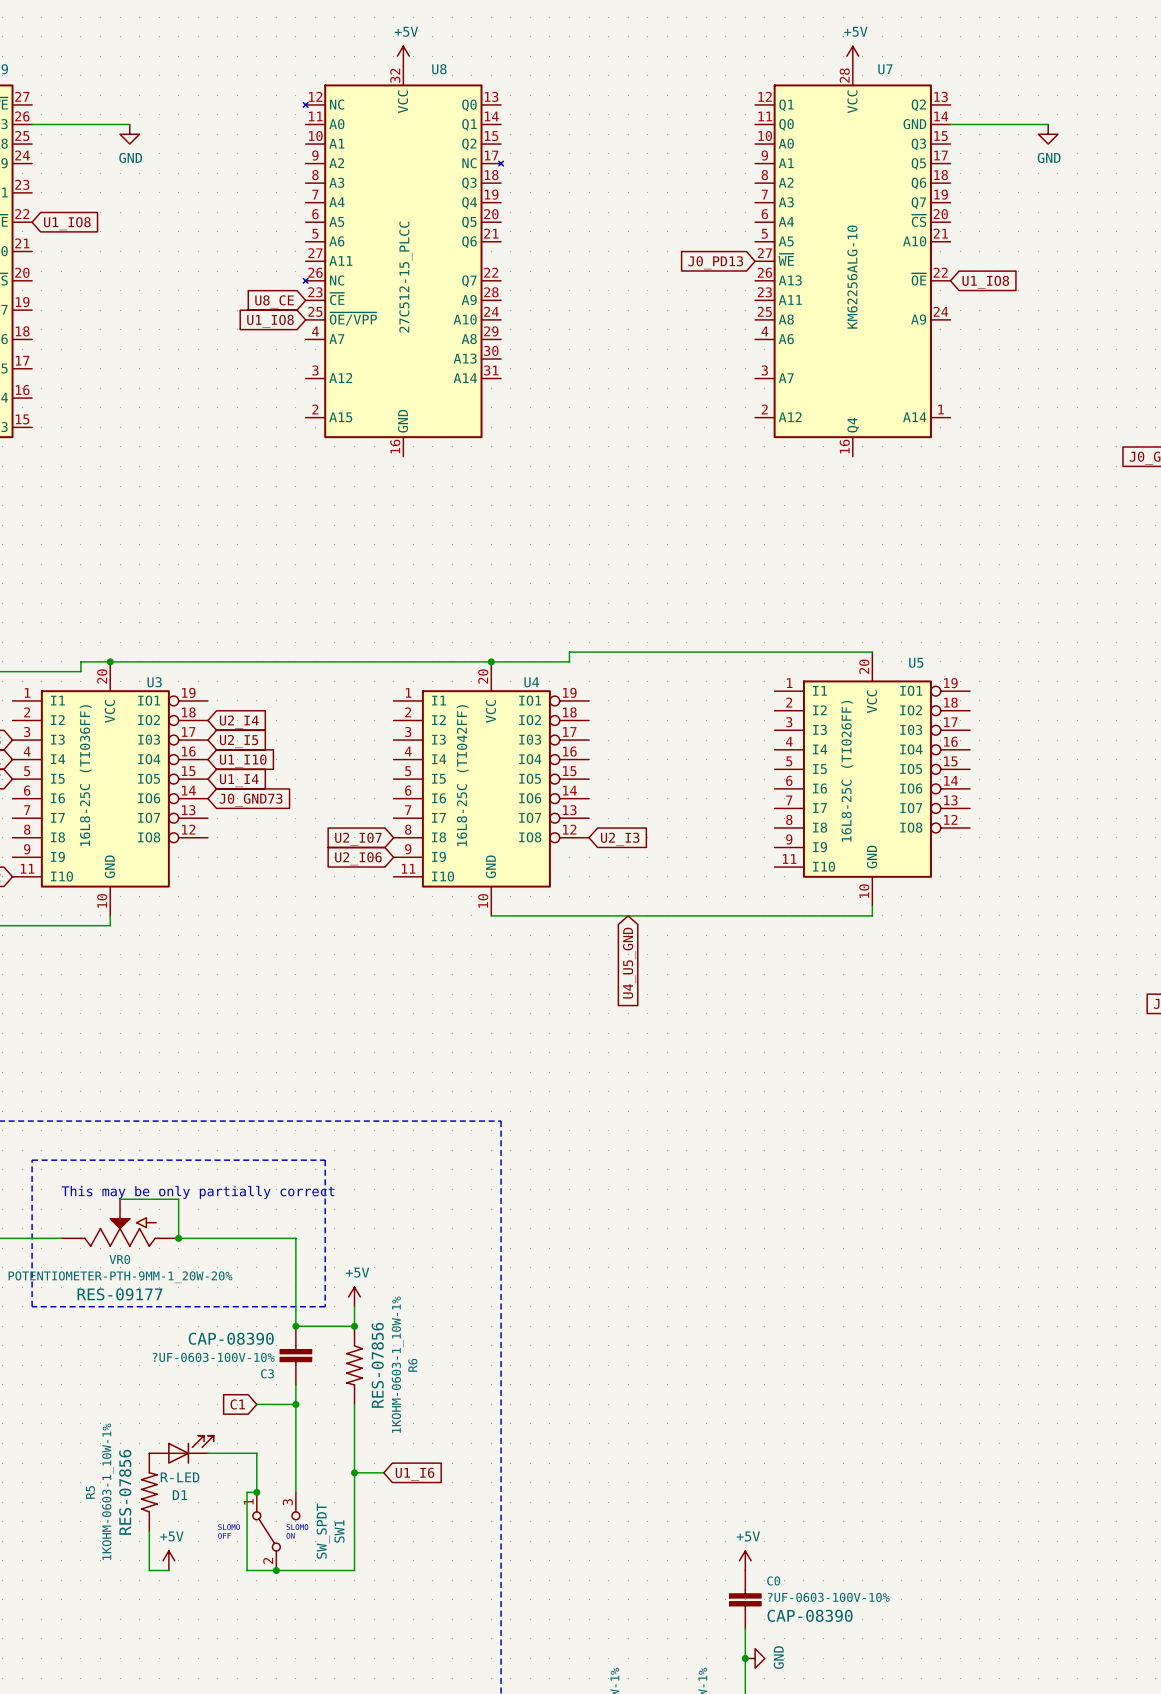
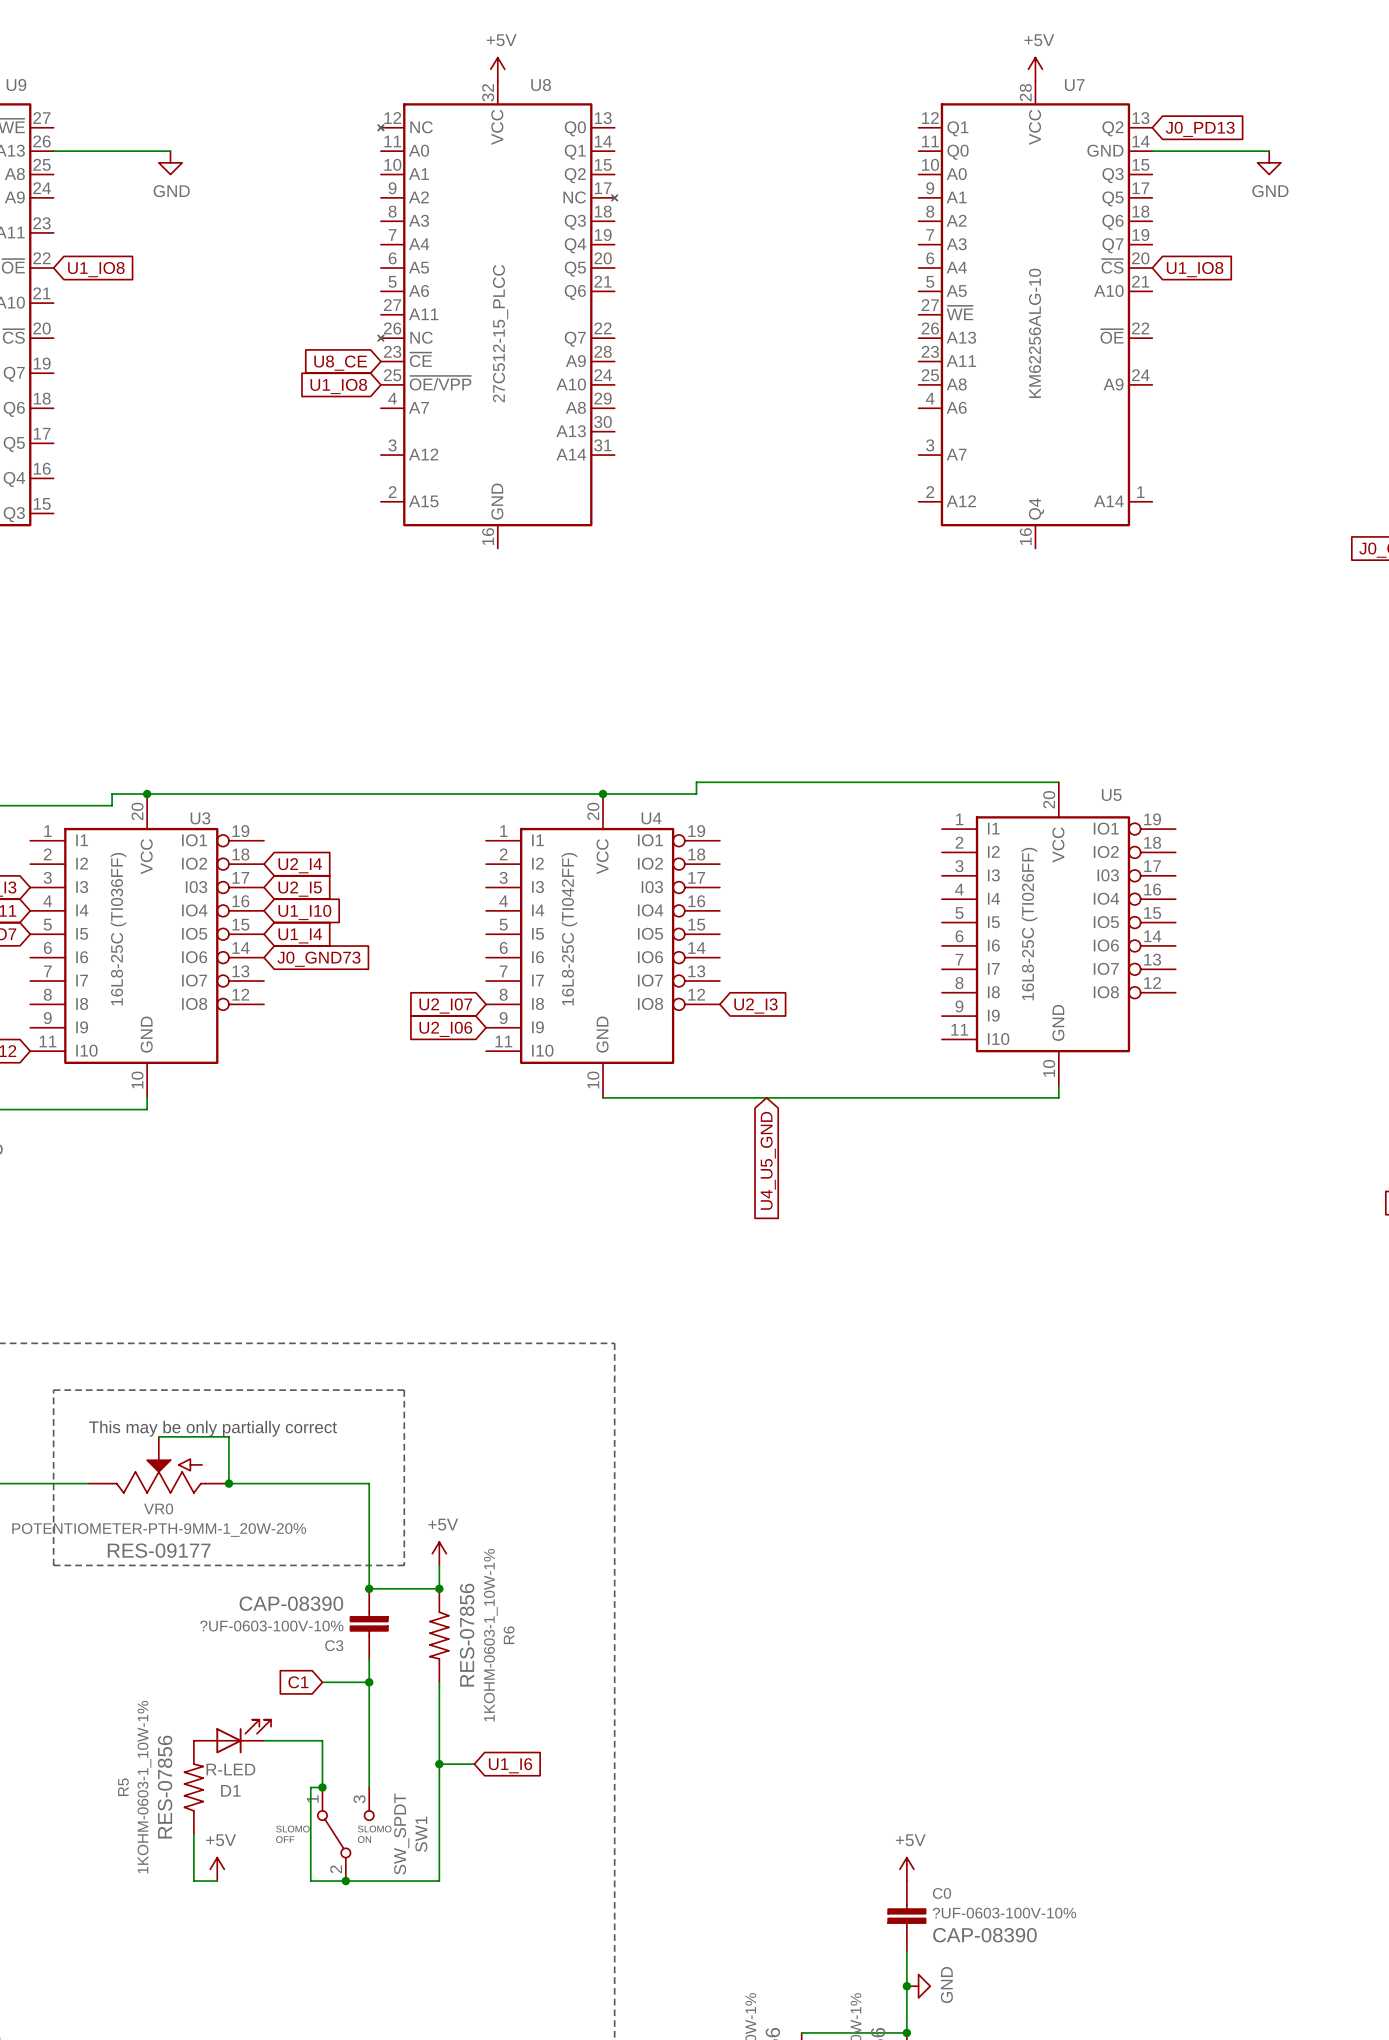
global label: none -> J0_PD13 (1200, 129)
global label: J0_PD13 (715, 262) -> none
global label position: U1_IO8 (985, 282) -> U1_IO8 (1195, 269)

